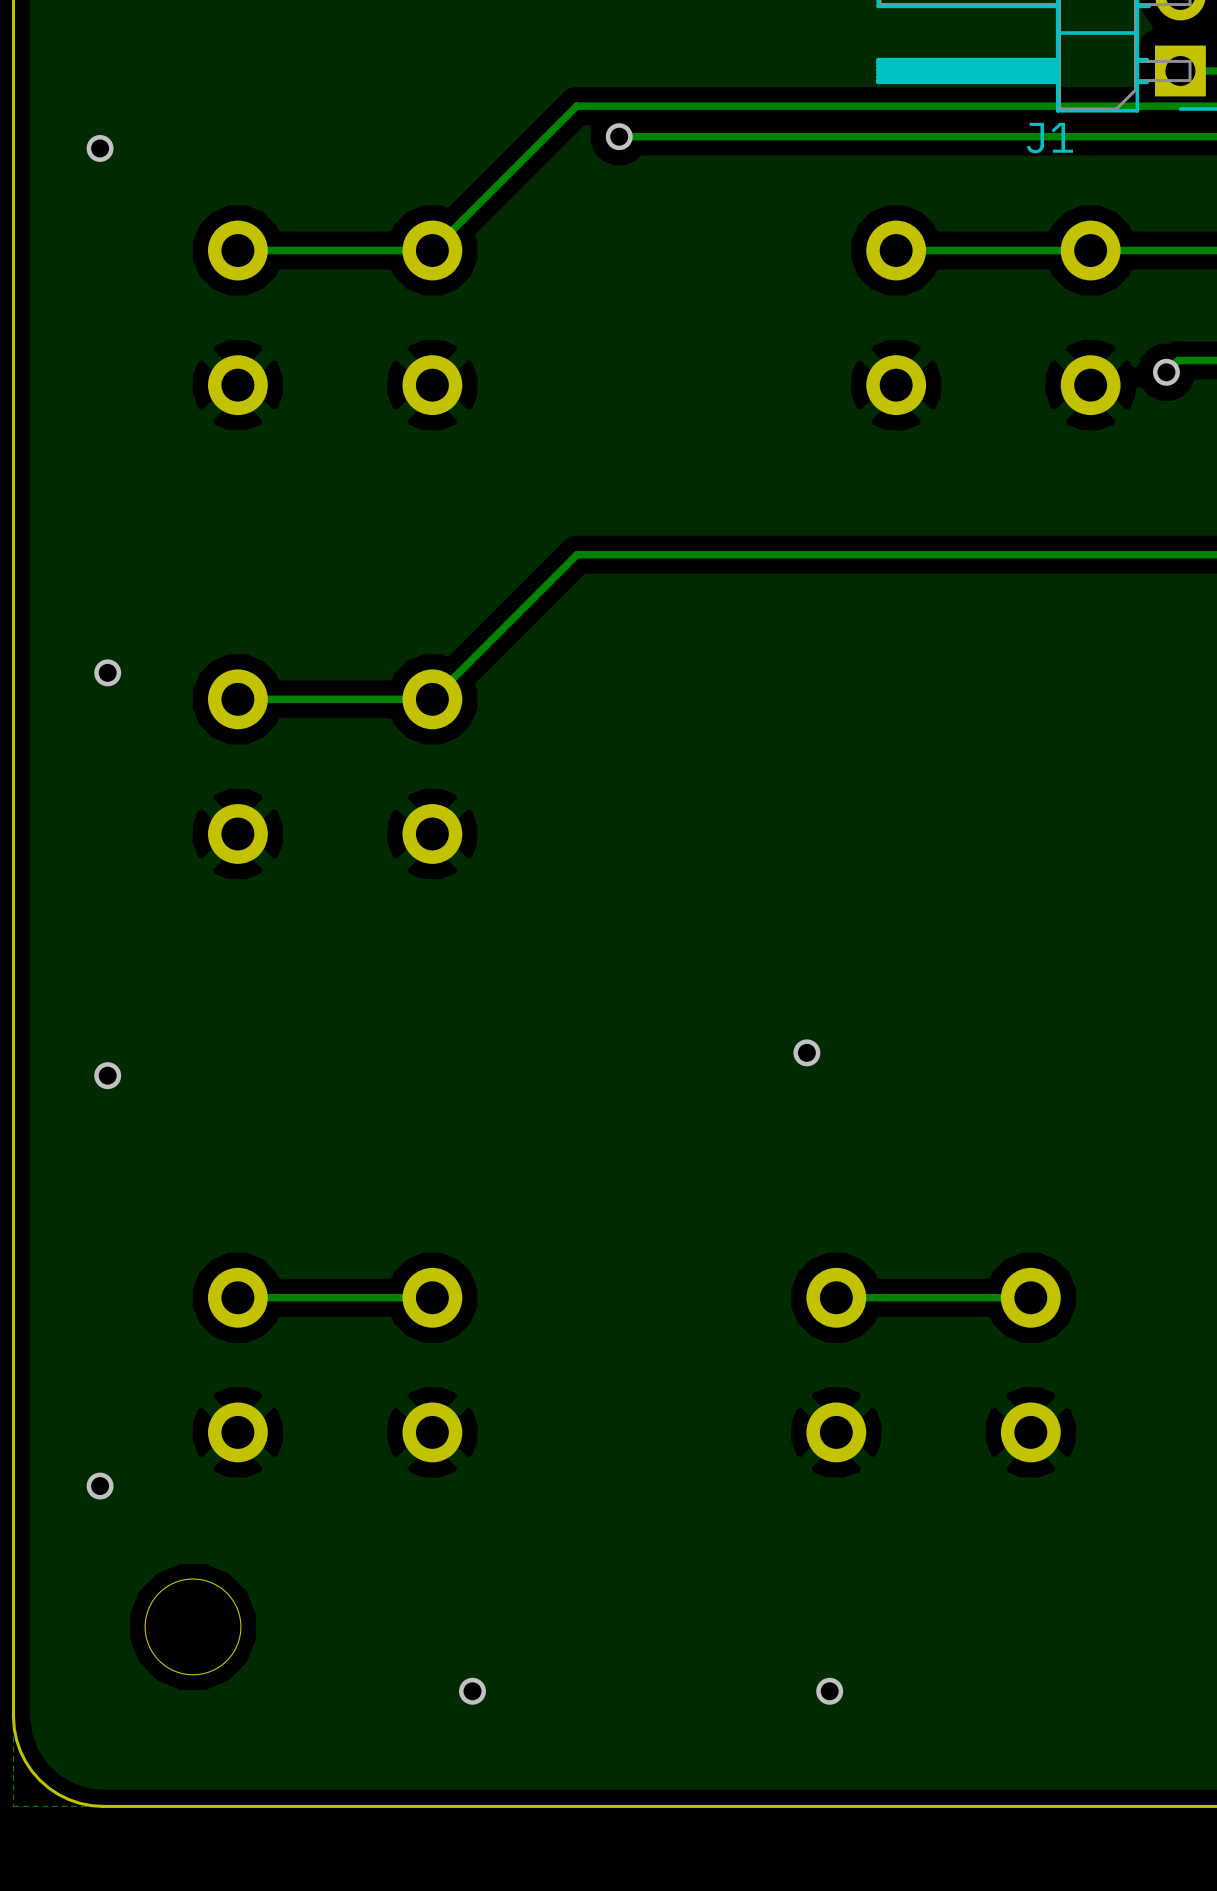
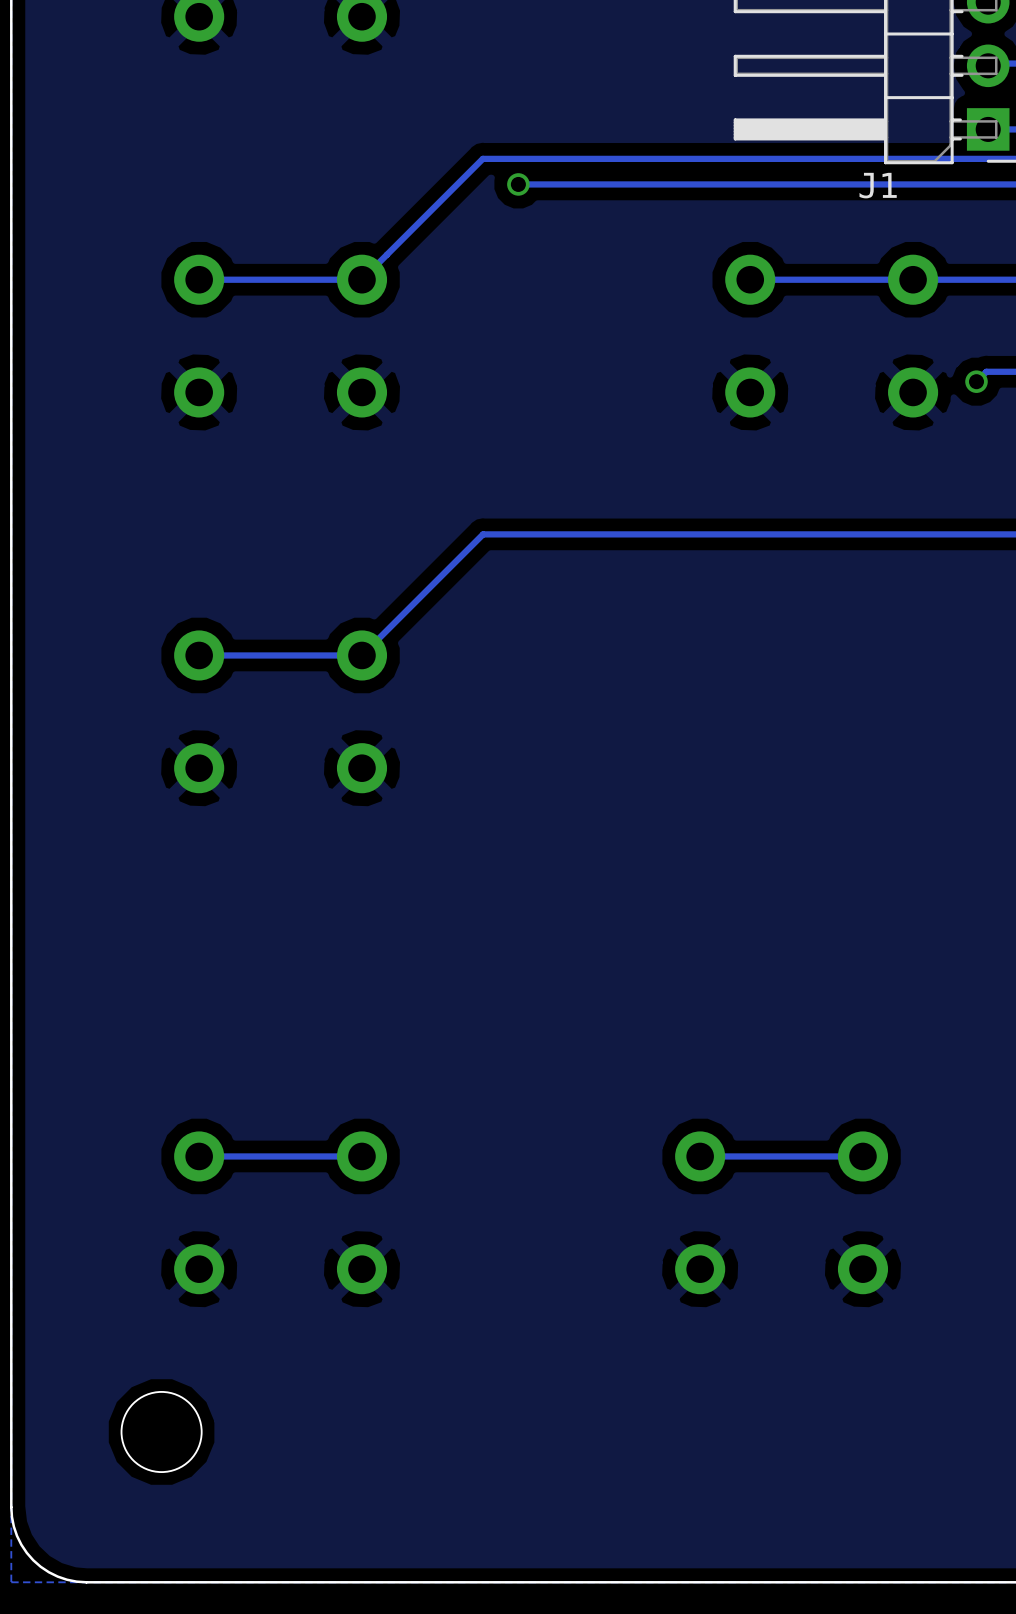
via: (100, 148) -> none
via: (107, 672) -> none
via: (806, 1052) -> none
via: (107, 1075) -> none
via: (100, 1486) -> none
via: (472, 1691) -> none
via: (829, 1691) -> none

